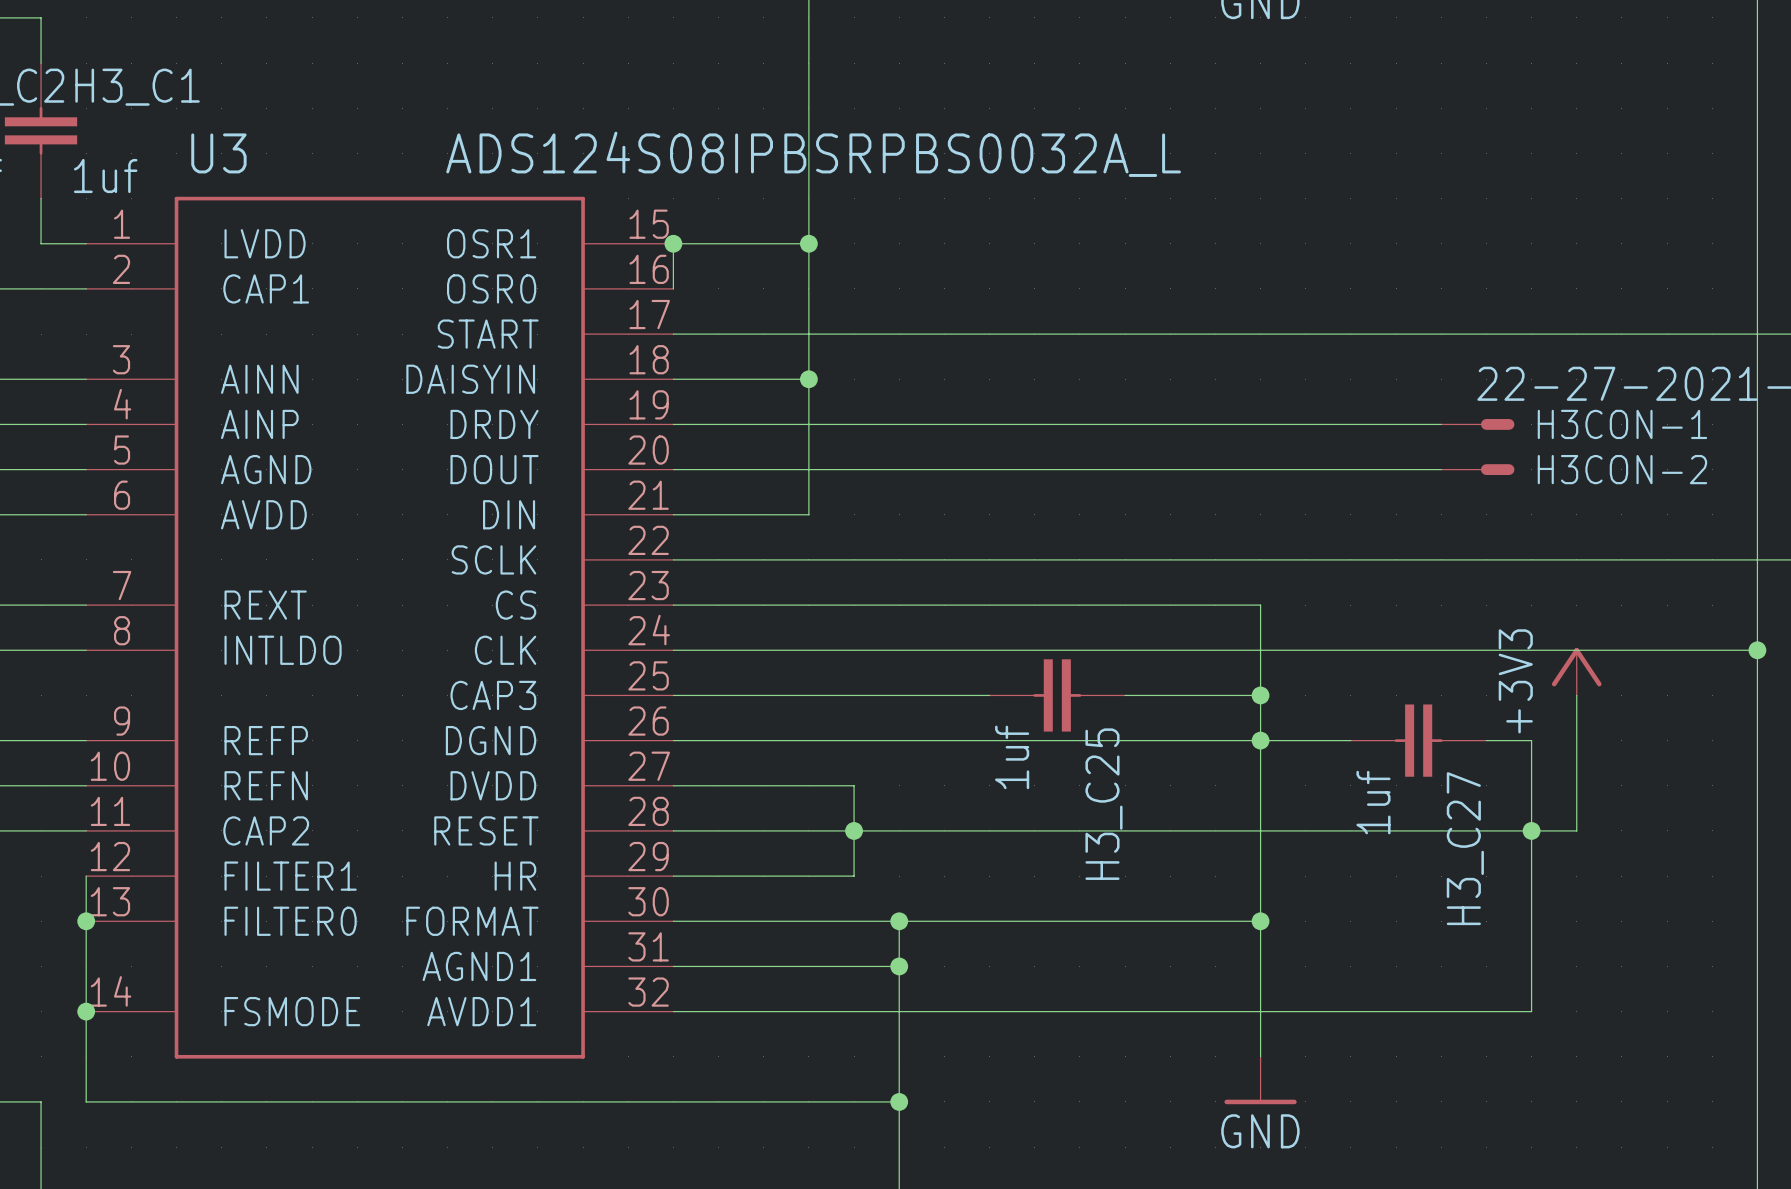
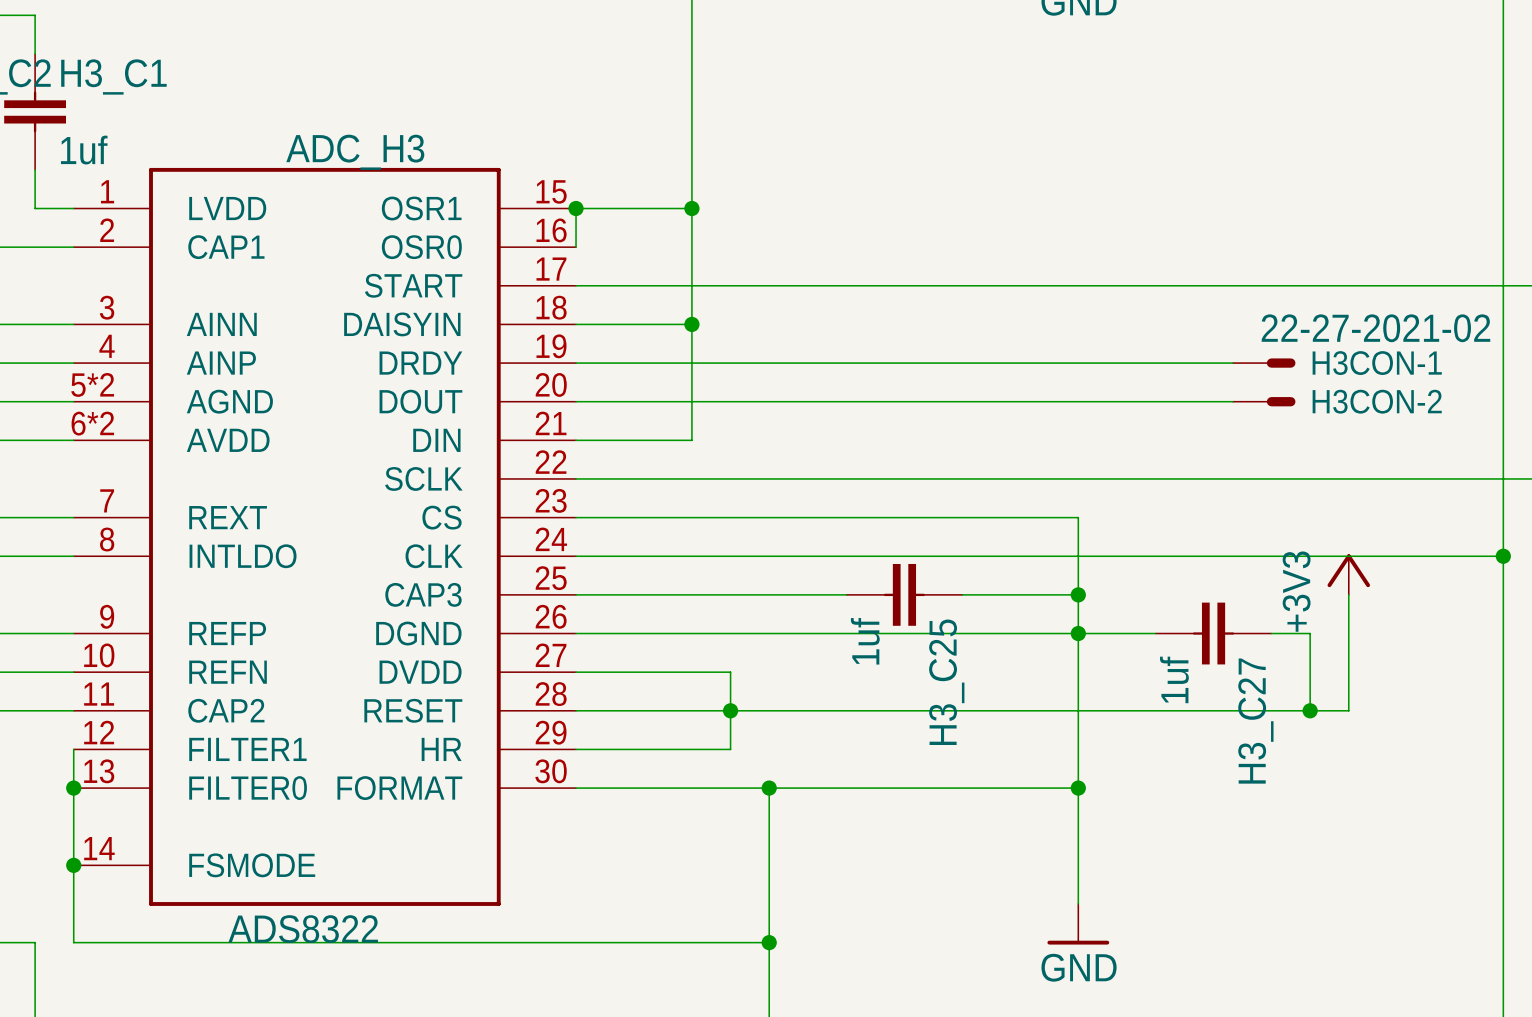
U3: ADS124S08IPBSRPBS0032A_L (379, 627) -> none
ADC_H3: none -> ADS8322 (324, 536)
wire: (1531, 830) (1531, 1011) (673, 1011) -> none
wire: (673, 966) (899, 966) -> none
junction: (899, 966) -> none

